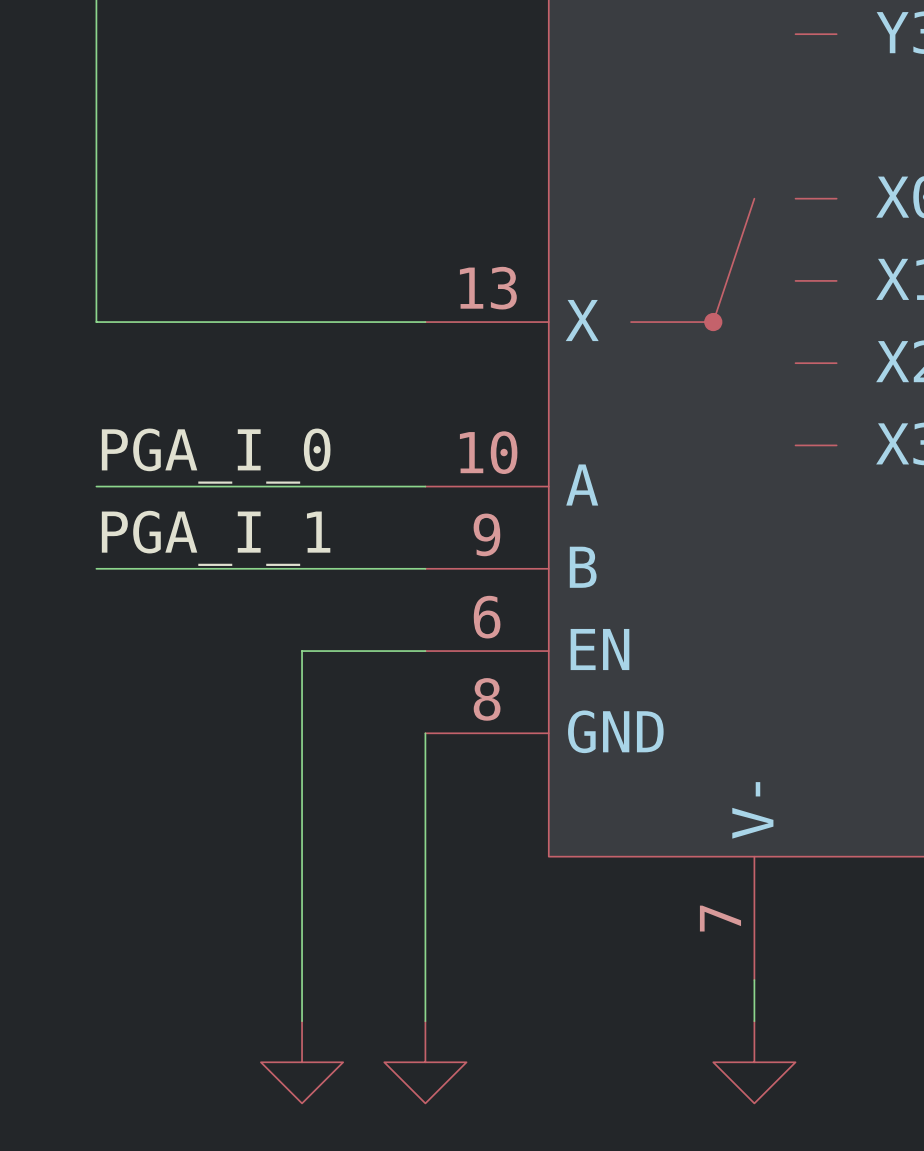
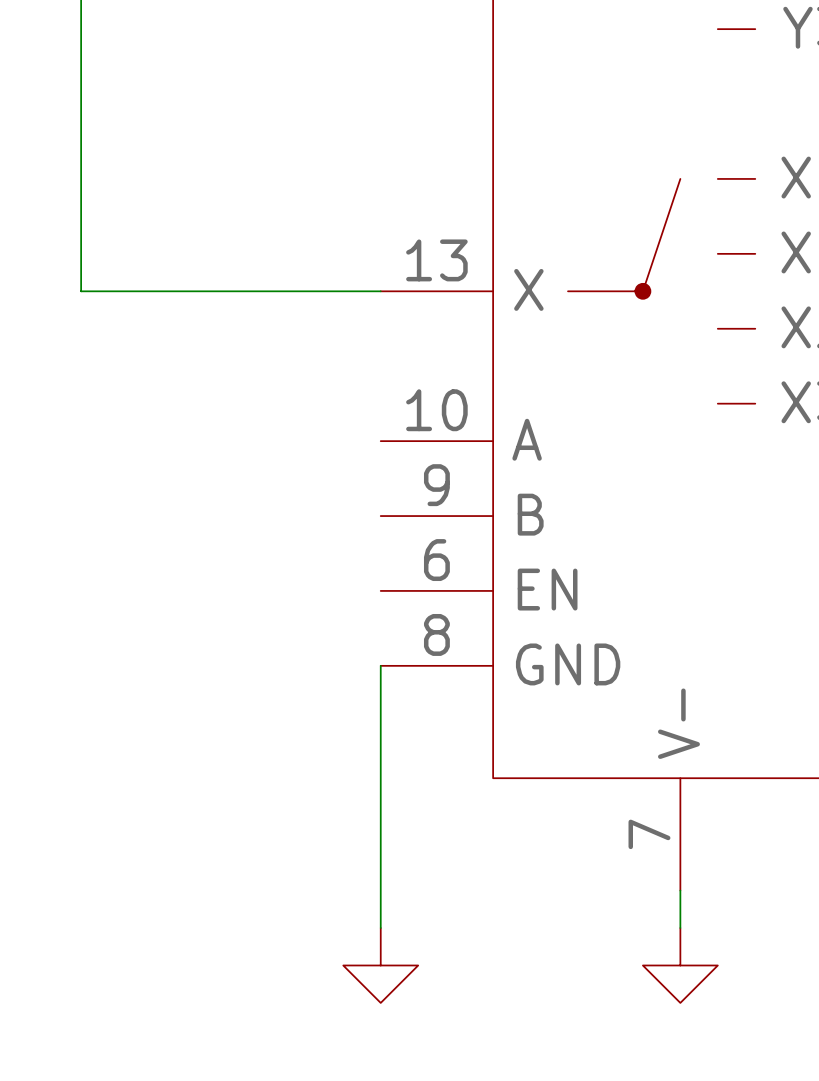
label: PGA_I_0 (216, 456) -> none
wire: (96, 486) (425, 486) -> none
label: PGA_I_1 (216, 538) -> none
wire: (96, 568) (425, 568) -> none
wire: (425, 651) (302, 651) (302, 1021) -> none
power symbol: (302, 1062) -> none

